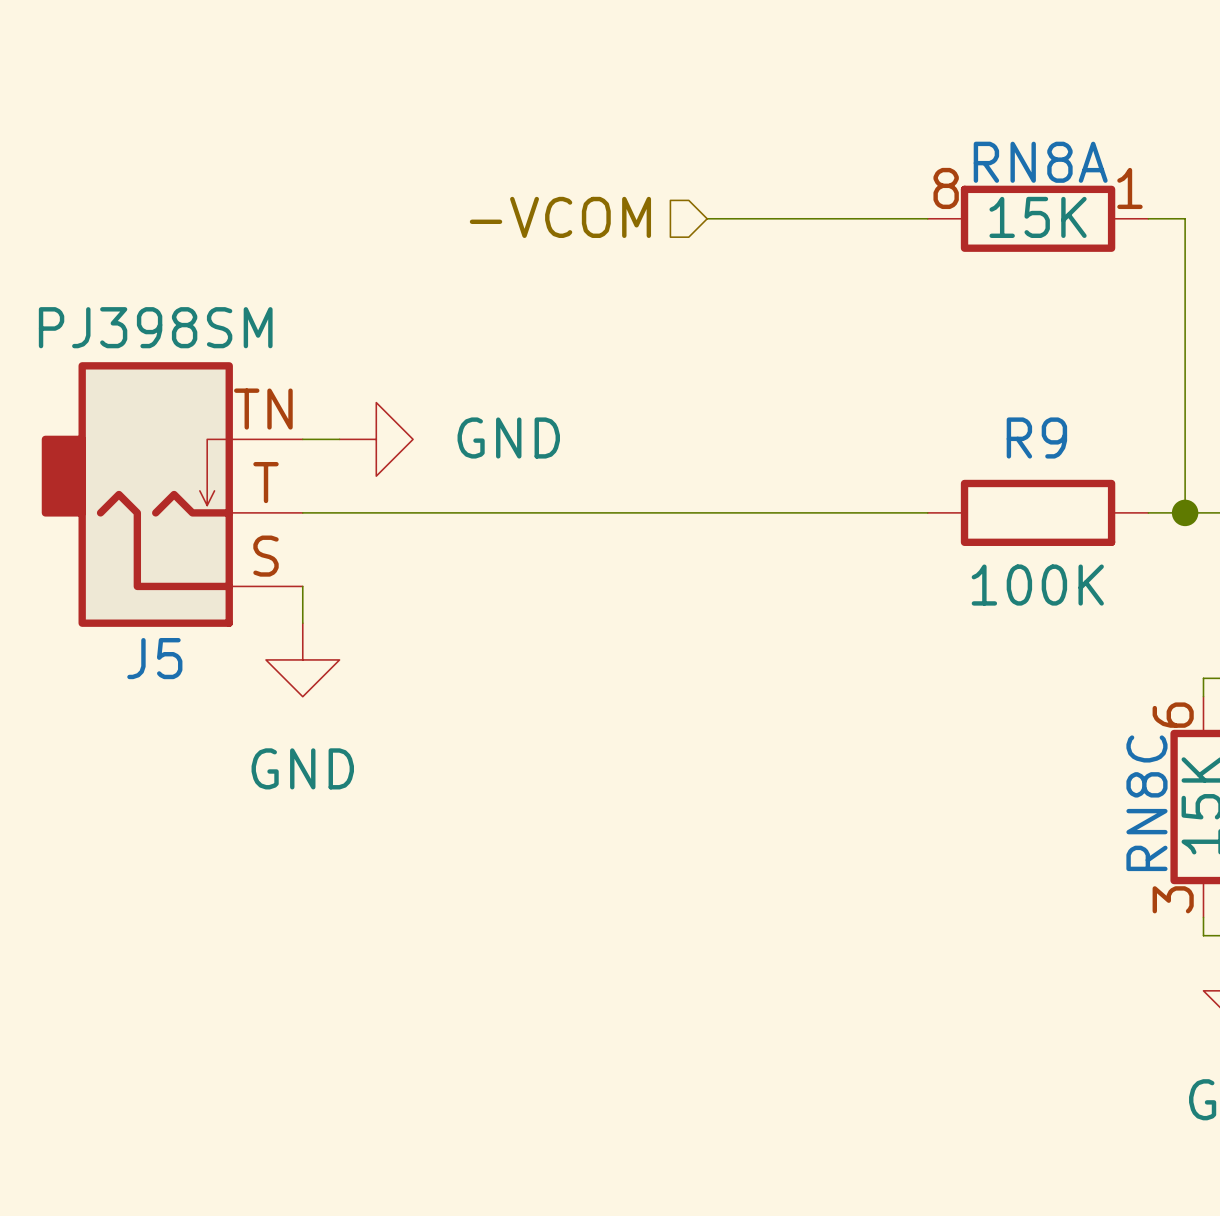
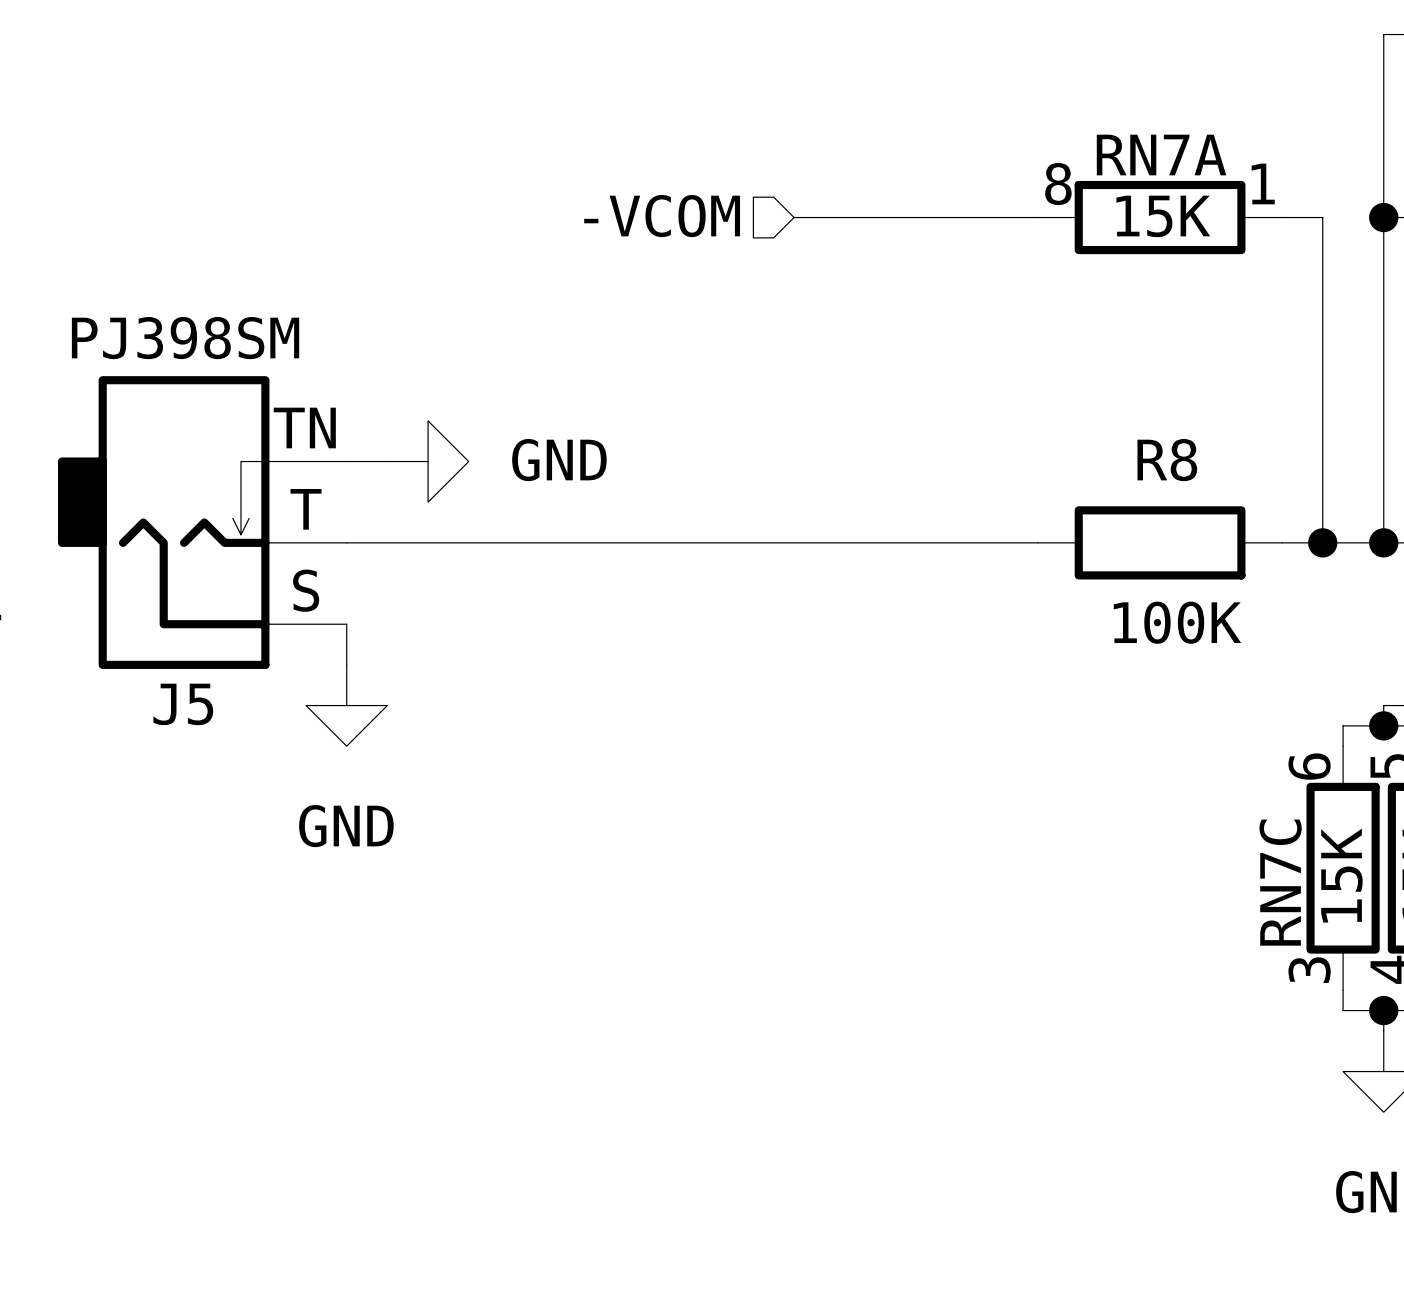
RN8A name: RN8A (1040, 162) -> RN7A (1161, 155)
R9 name: R9 (1036, 437) -> R8 (1167, 460)
RN8C name: RN8C (1146, 803) -> RN7C (1280, 882)

